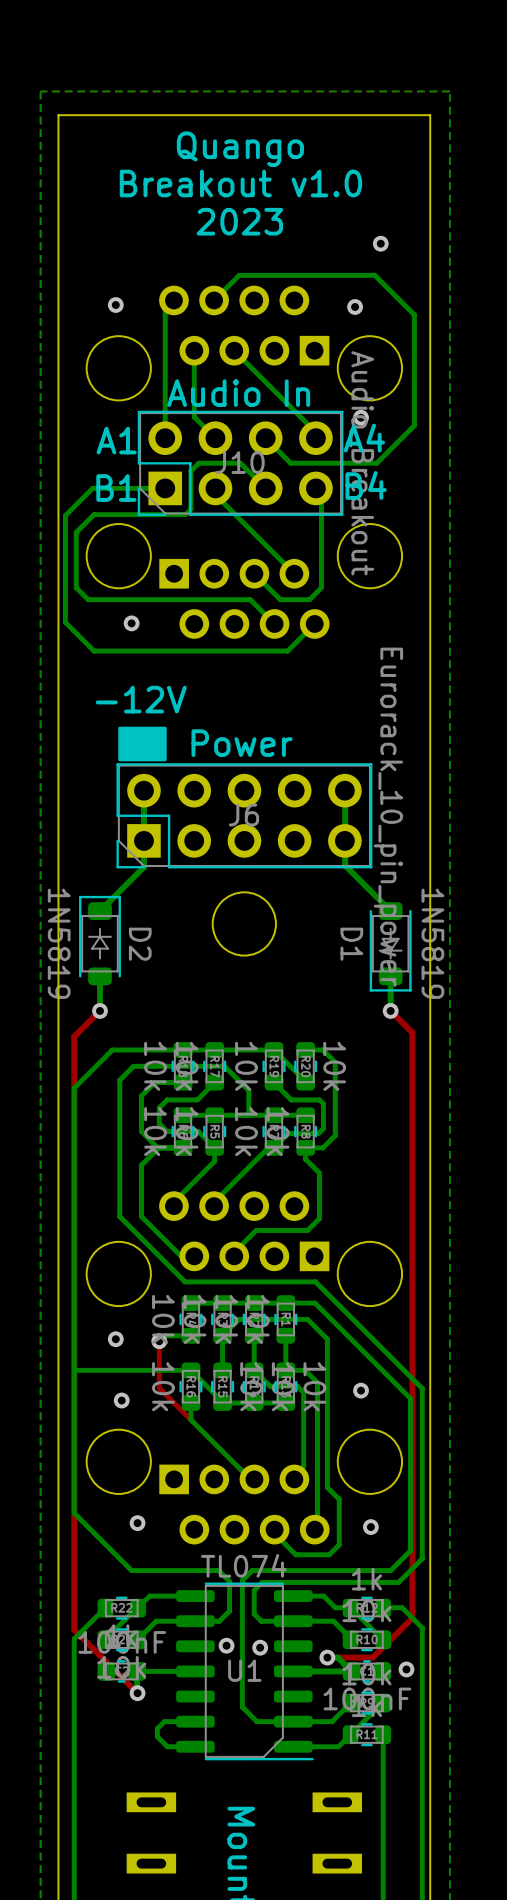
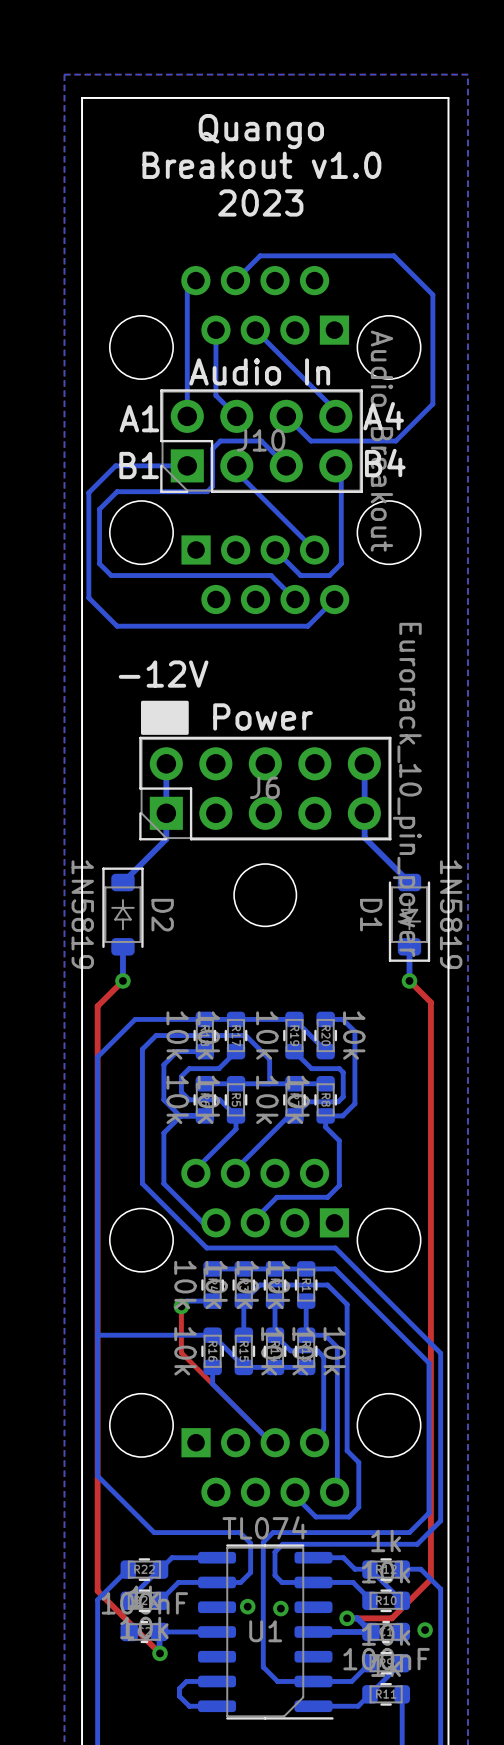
via: (380, 243) -> none
via: (115, 305) -> none
via: (355, 306) -> none
via: (361, 417) -> none
via: (131, 623) -> none
via: (115, 1339) -> none
via: (361, 1390) -> none
via: (121, 1400) -> none
via: (137, 1523) -> none
via: (370, 1527) -> none

